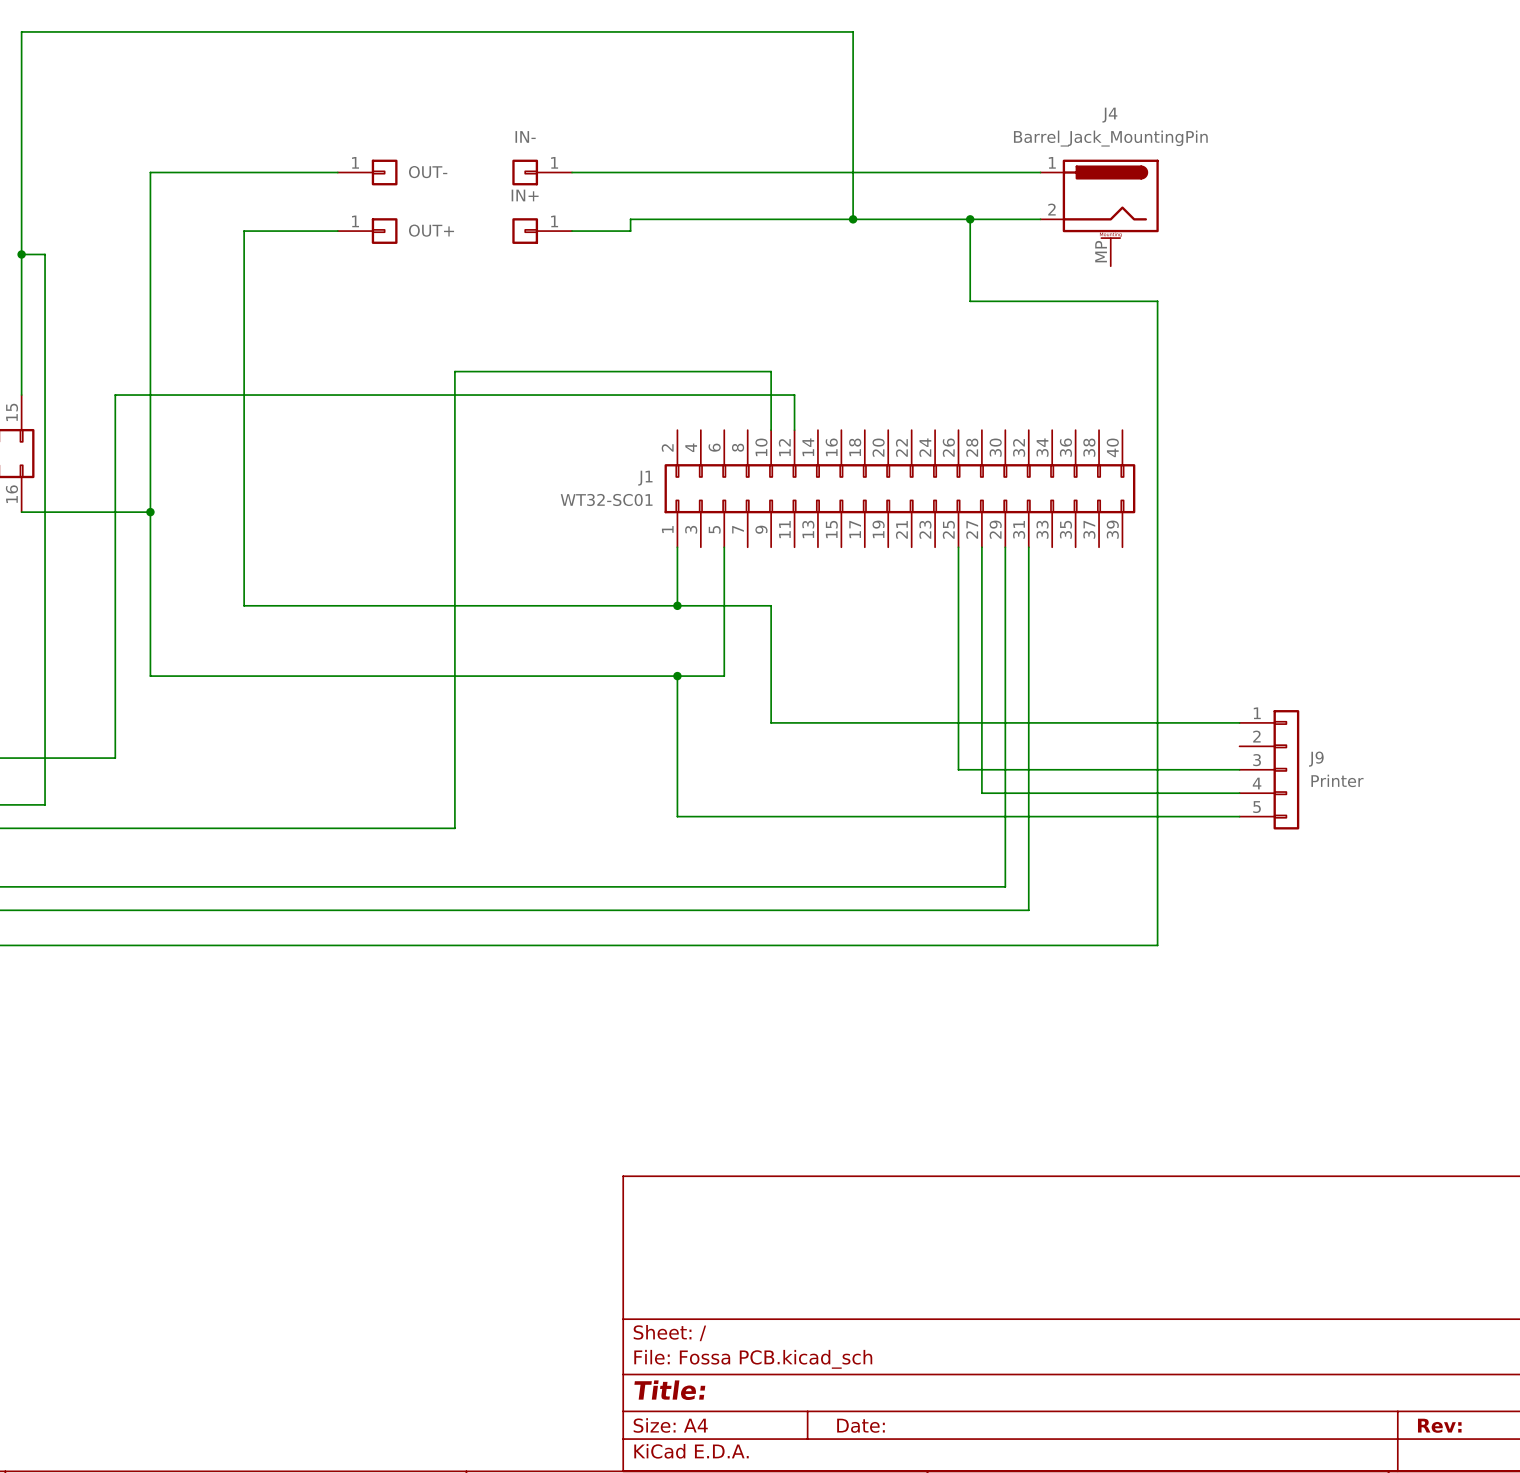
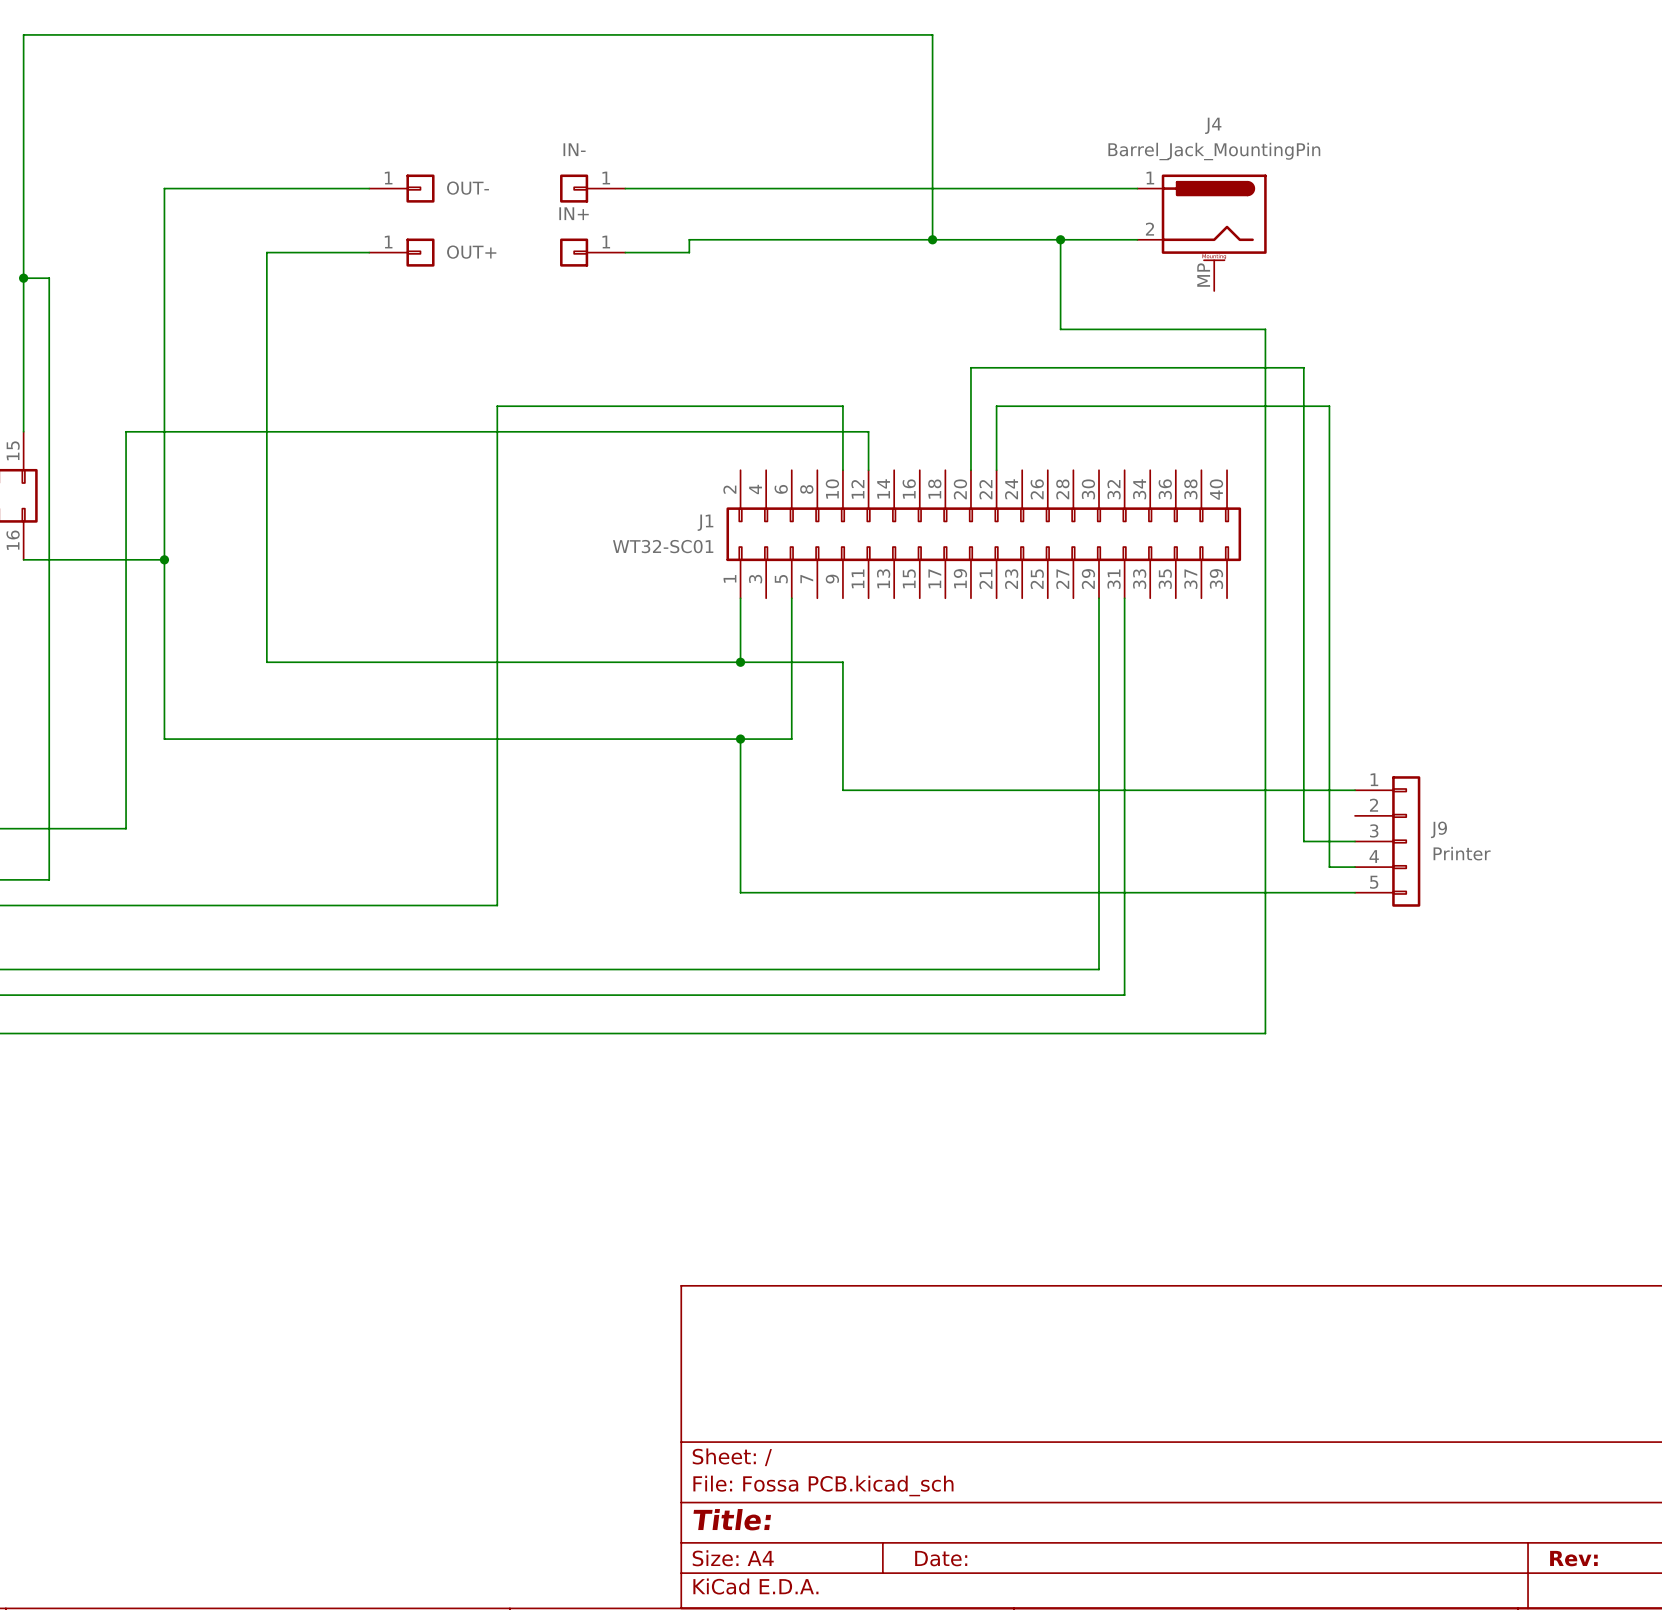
wire: (958, 547) (958, 769) (1192, 769) -> (970, 470) (970, 367) (1303, 367) (1303, 841)
wire: (981, 547) (981, 793) (1216, 793) -> (996, 470) (996, 406) (1329, 406) (1329, 867)

